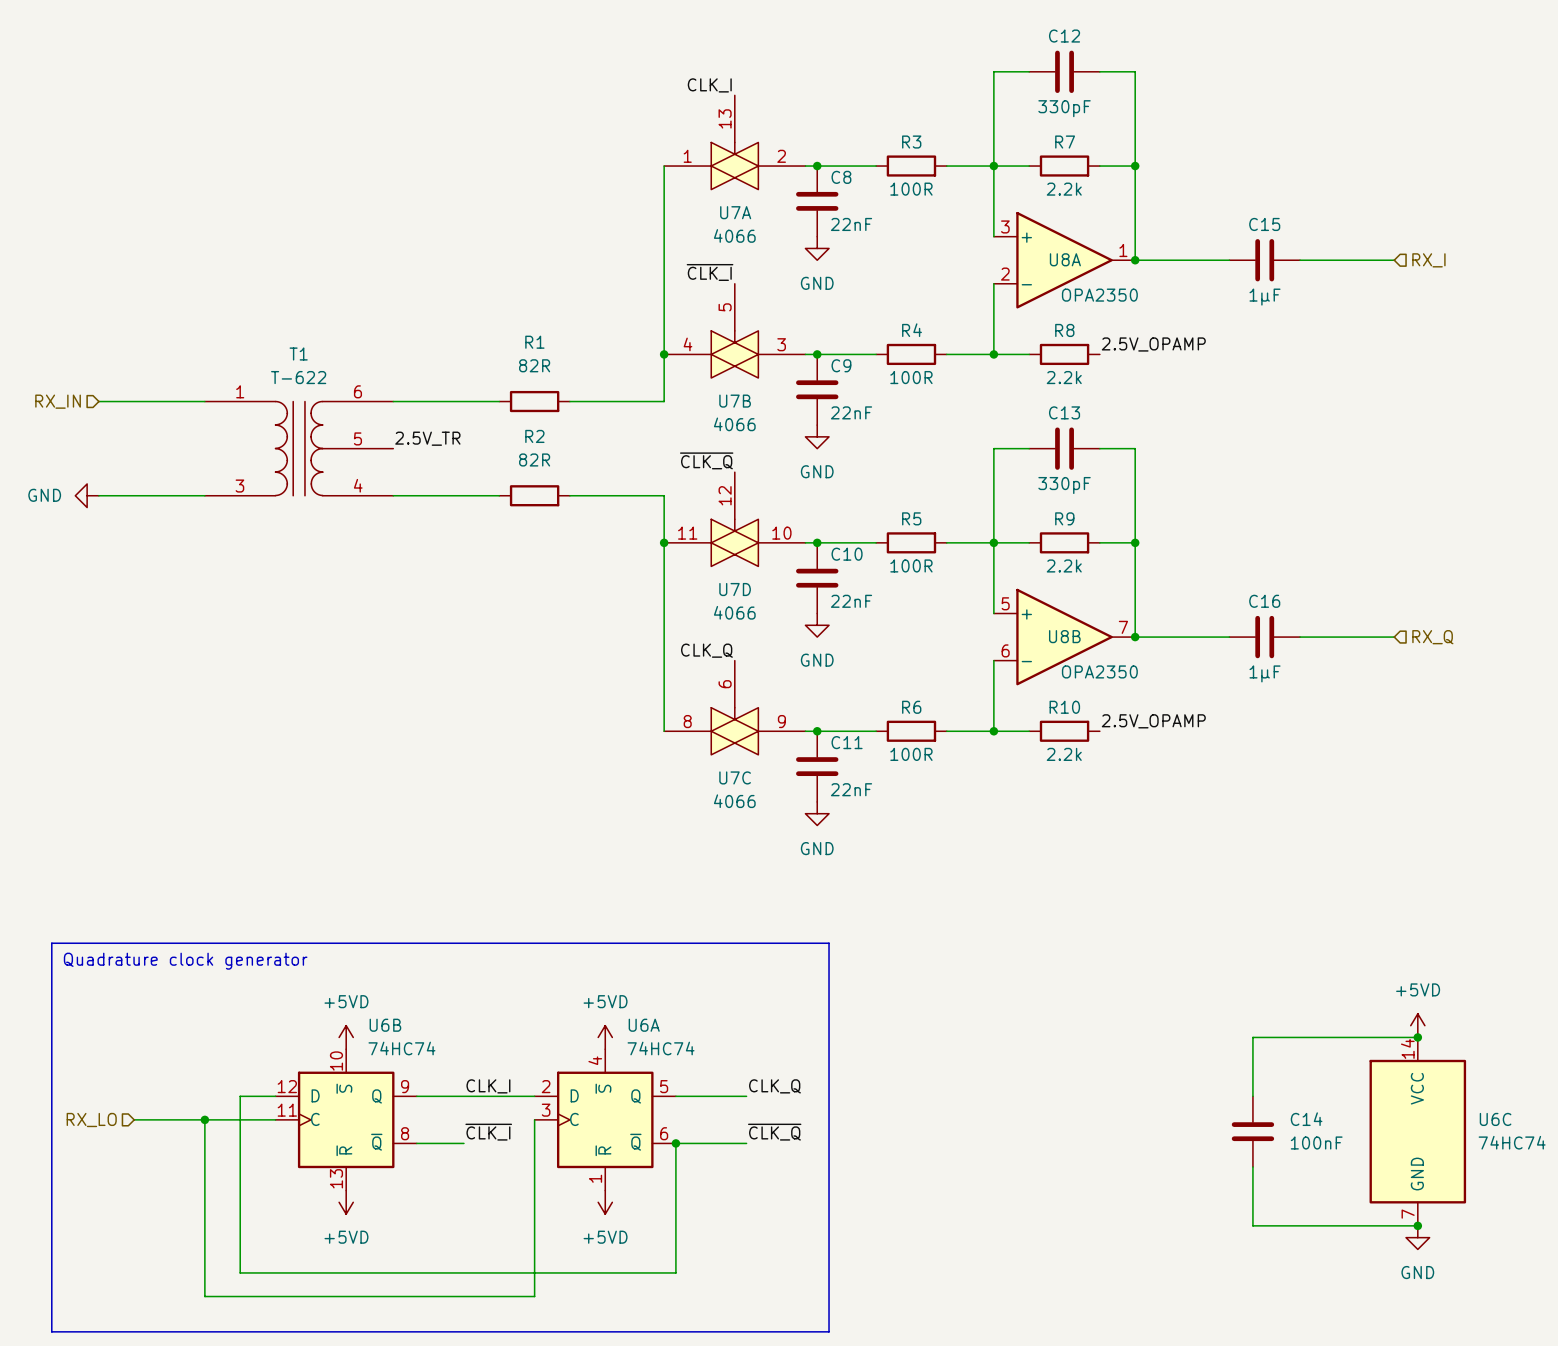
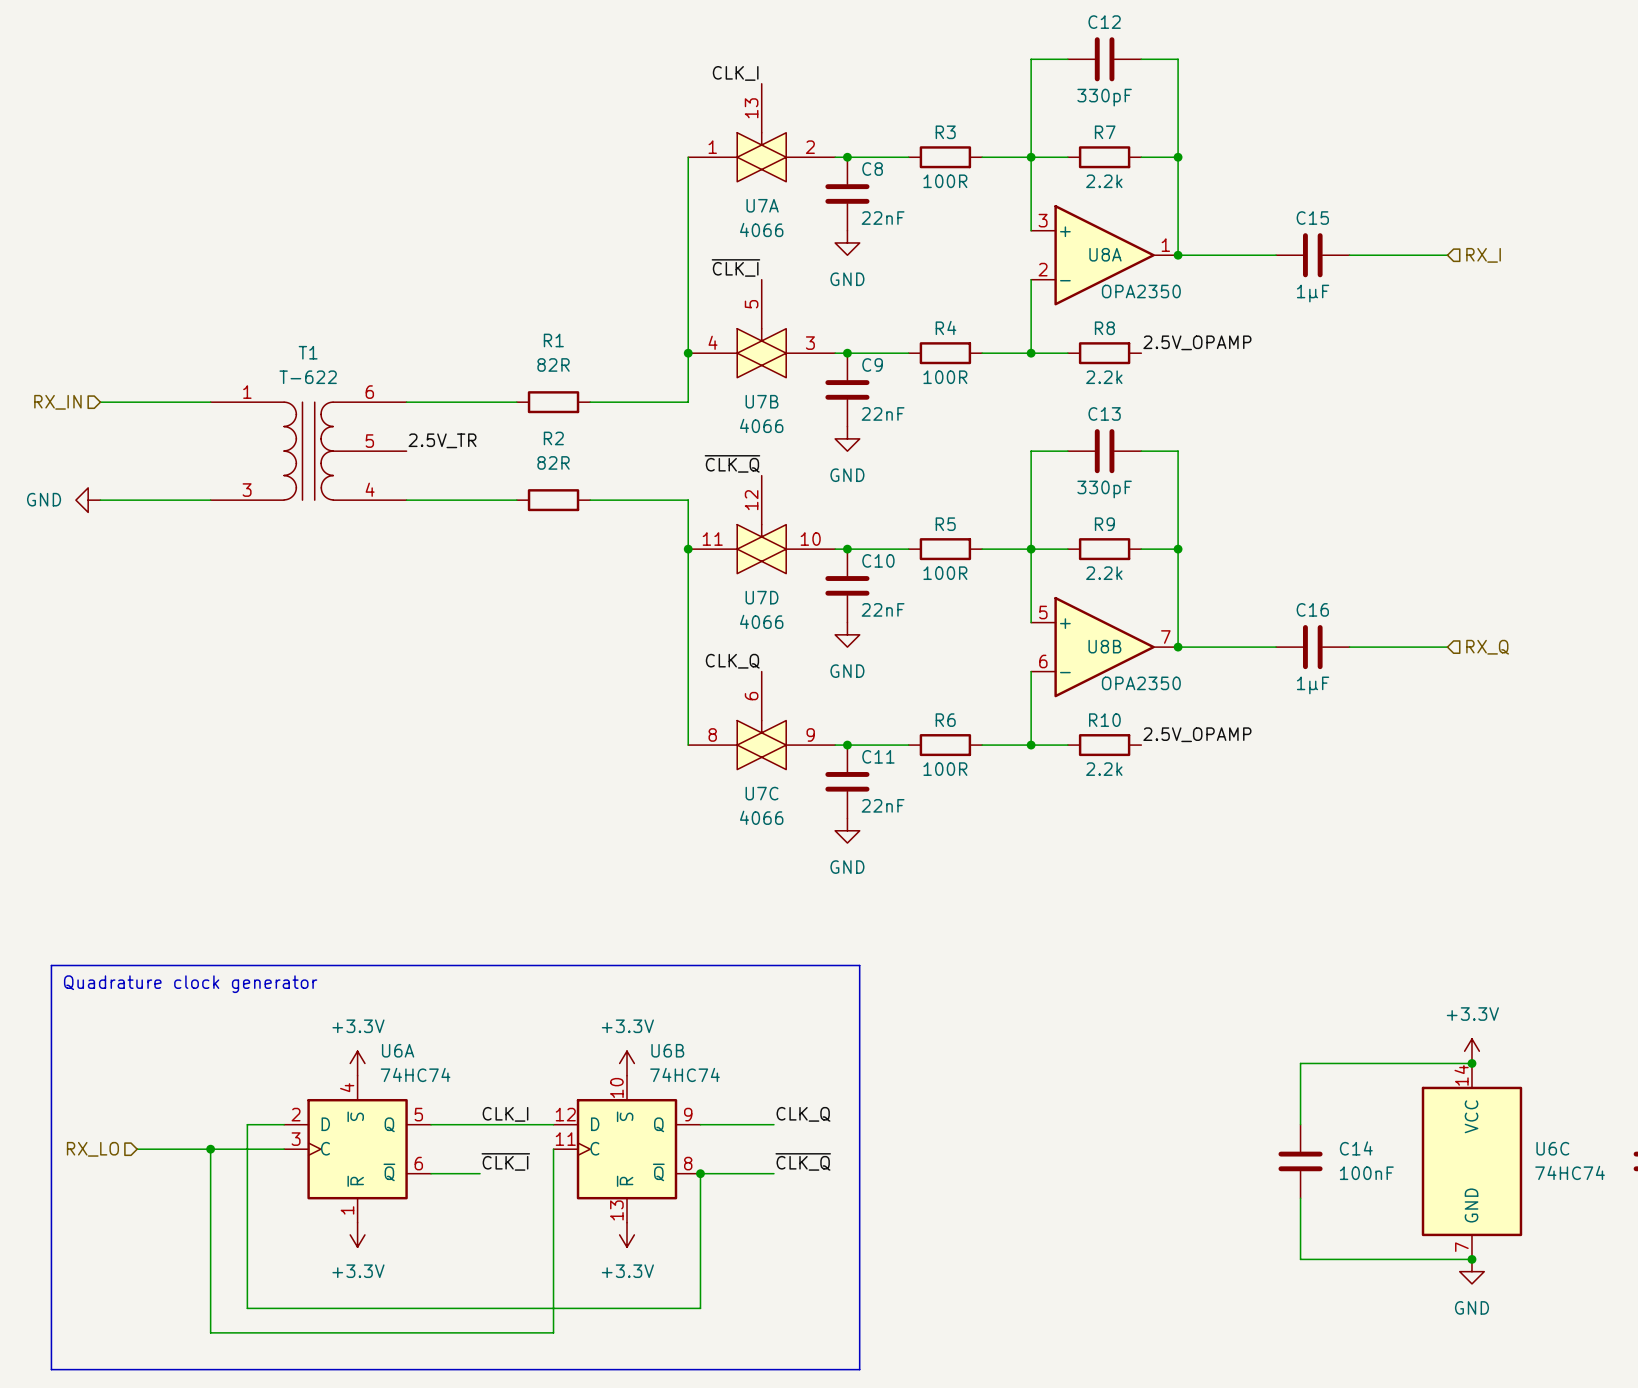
power symbol: +5VD (1417, 1025) -> +3.3V (1471, 1051)
power symbol: +5VD (346, 1037) -> +3.3V (357, 1063)
power symbol: +5VD (605, 1037) -> +3.3V (627, 1063)
U6B position: (346, 1119) -> (627, 1149)
U6A position: (605, 1119) -> (357, 1149)
power symbol: +5VD (346, 1202) -> +3.3V (357, 1234)
power symbol: +5VD (605, 1202) -> +3.3V (627, 1234)

